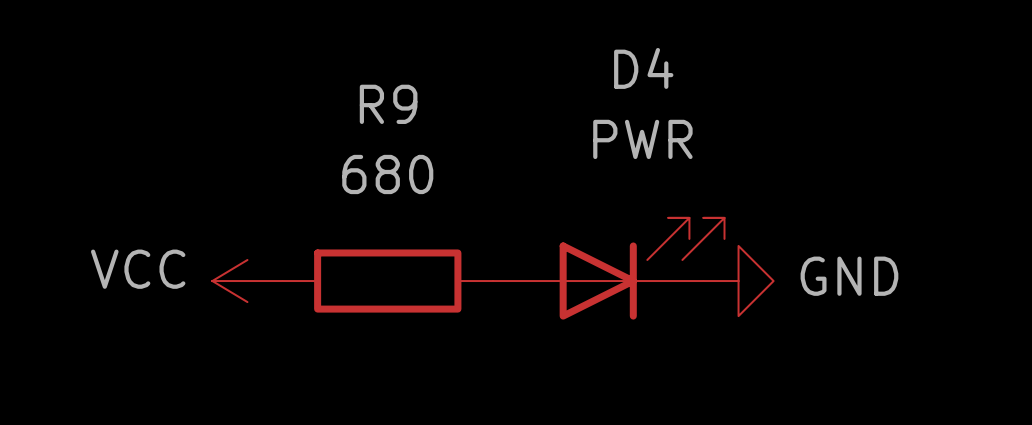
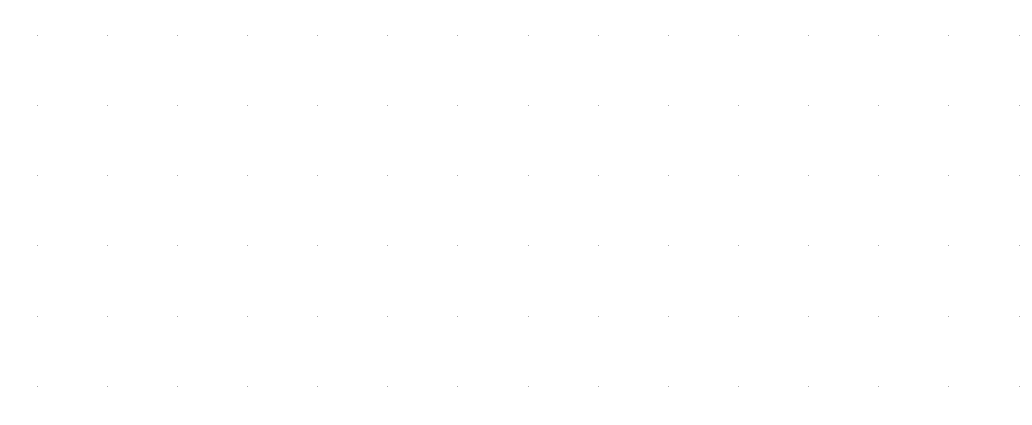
D4: PWR (608, 268) -> none
power symbol: VCC (247, 281) -> none
R9: 680 (387, 281) -> none
power symbol: GND (738, 281) -> none

